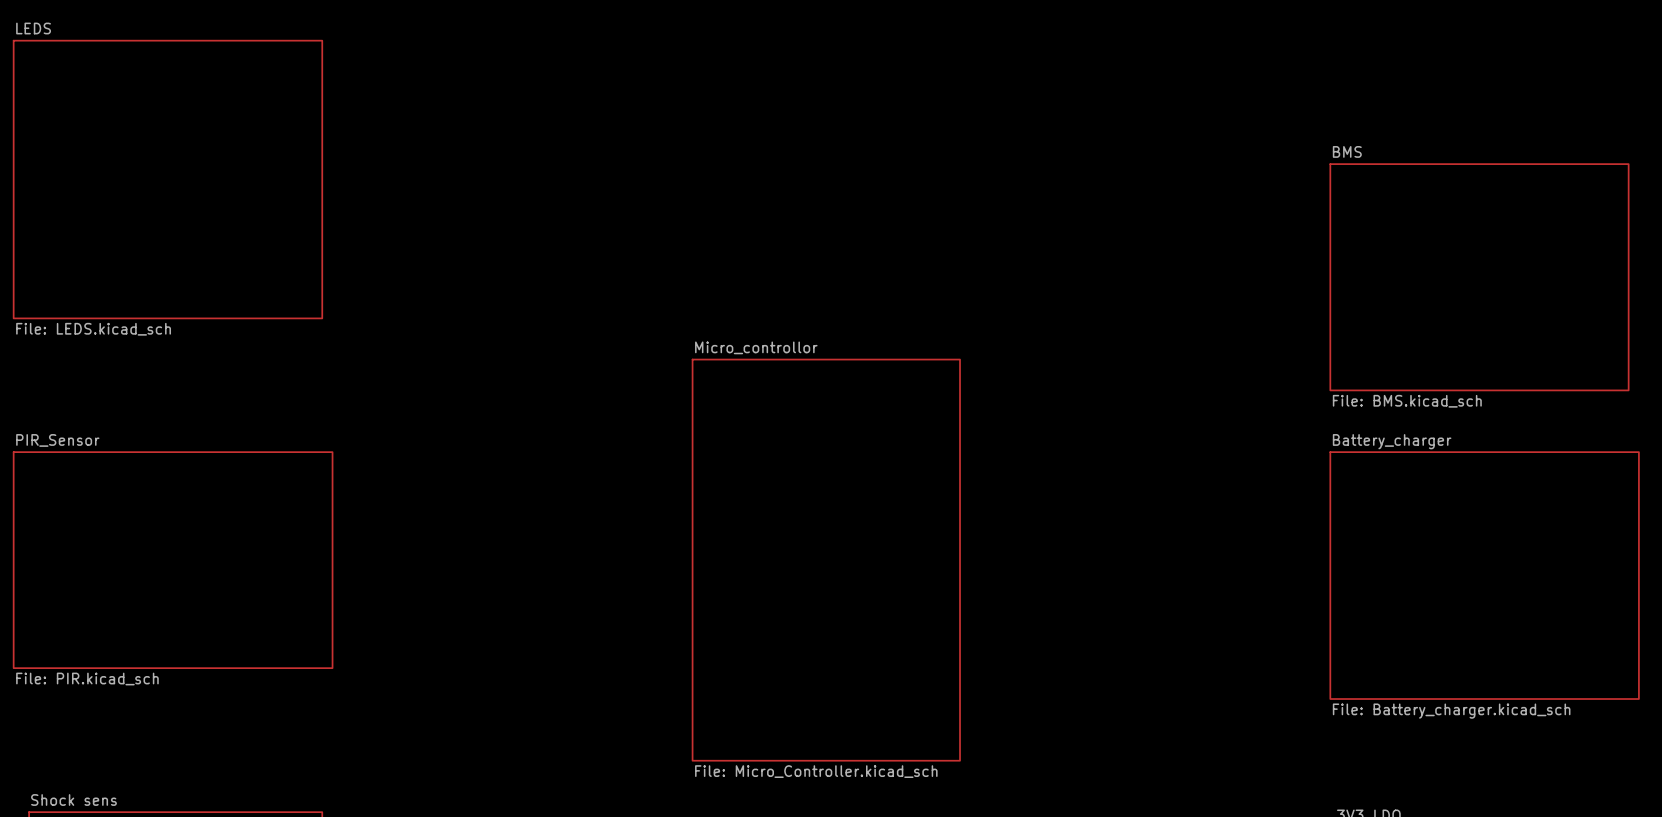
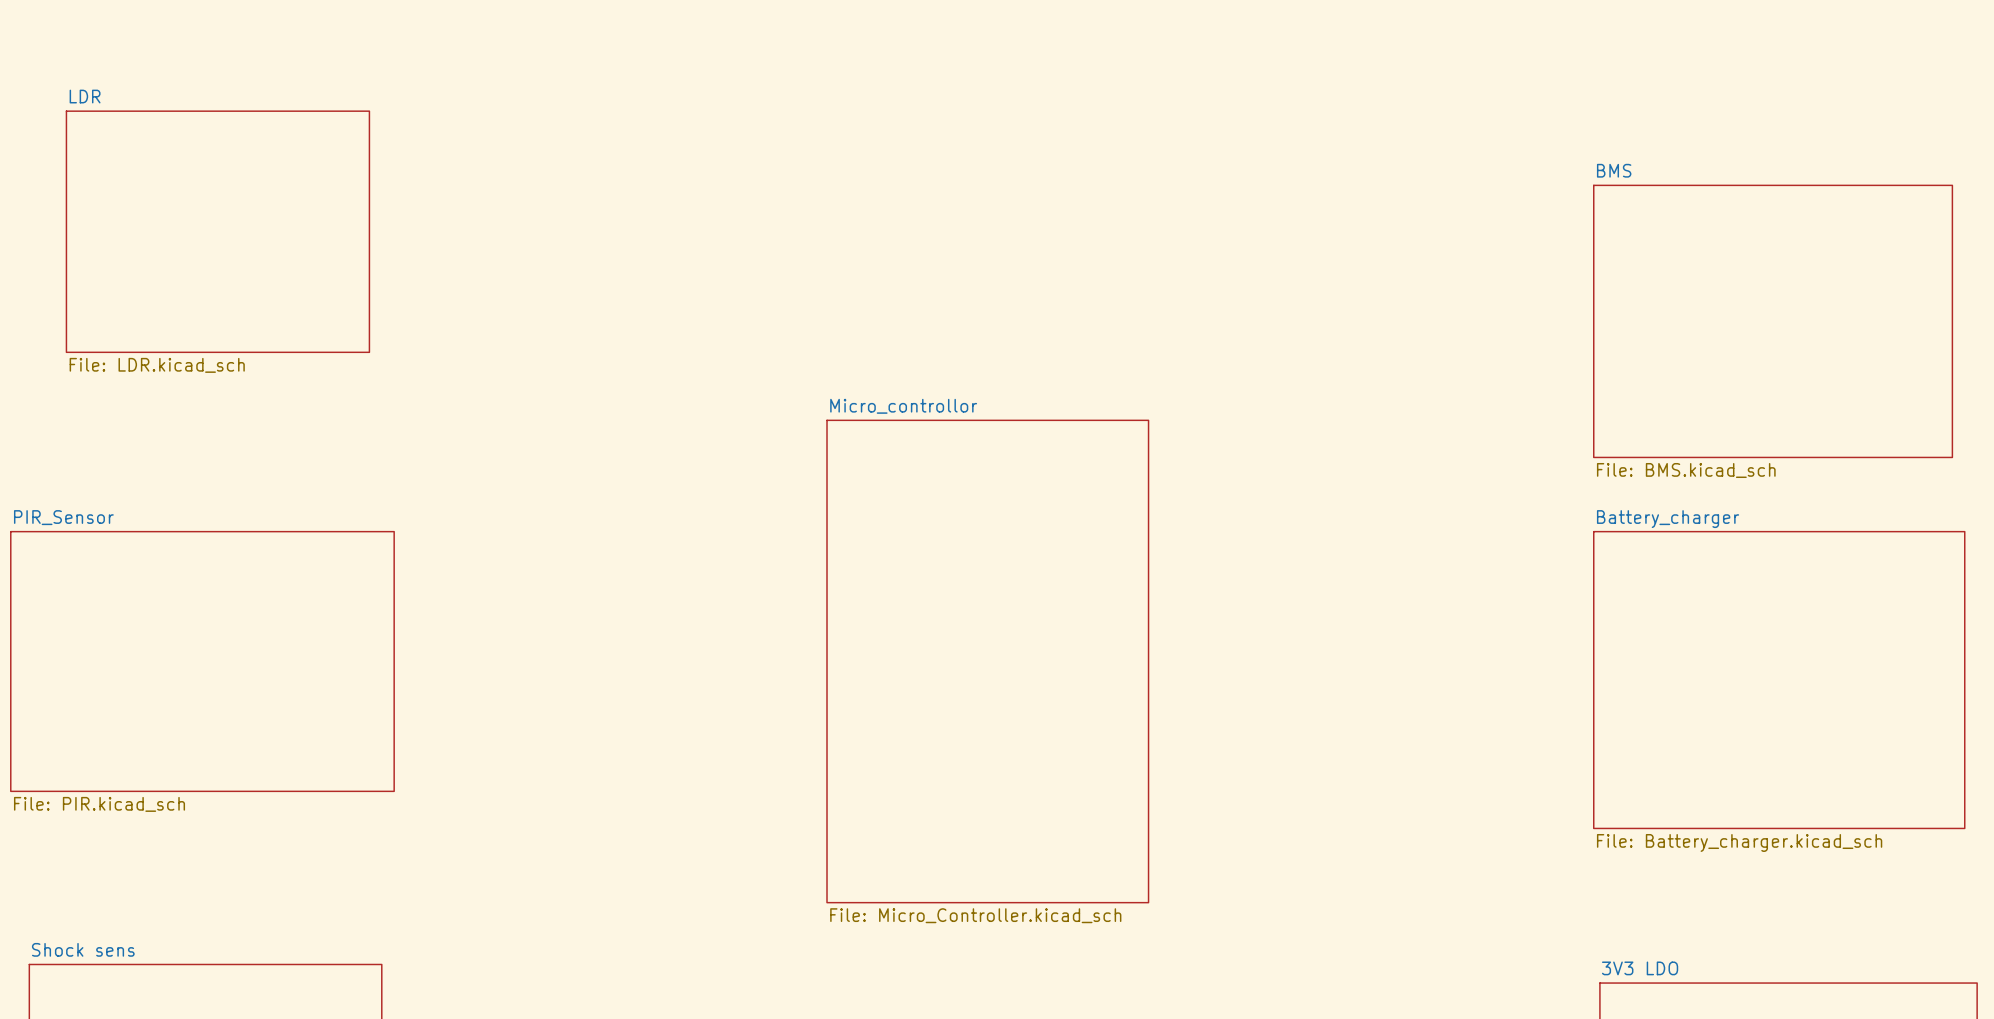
sheet LEDS: File: LEDS.kicad_sch (167, 179) -> none
sheet LDR: none -> File: LDR.kicad_sch (217, 231)

